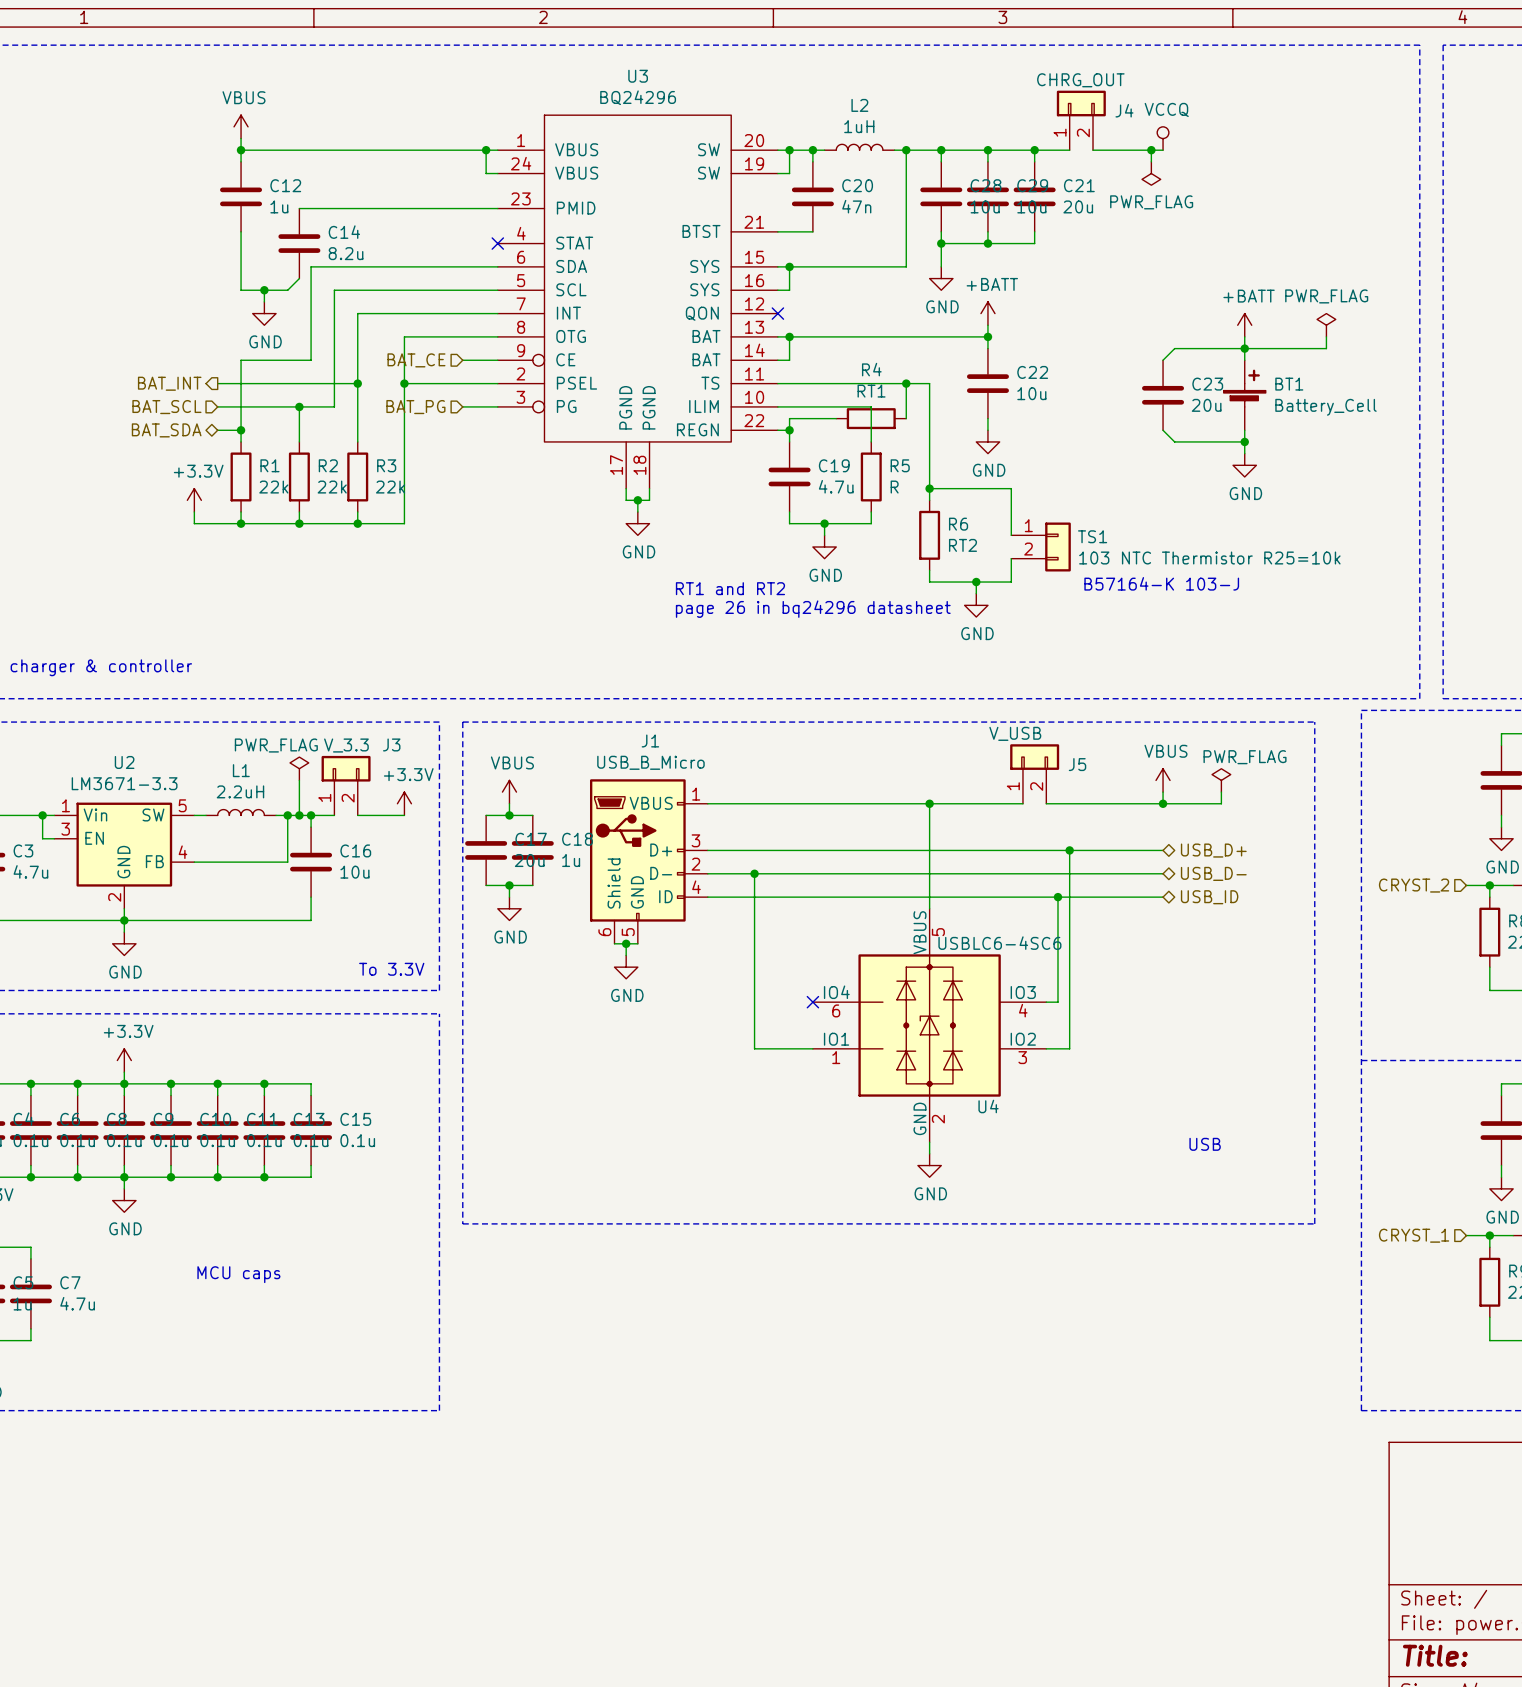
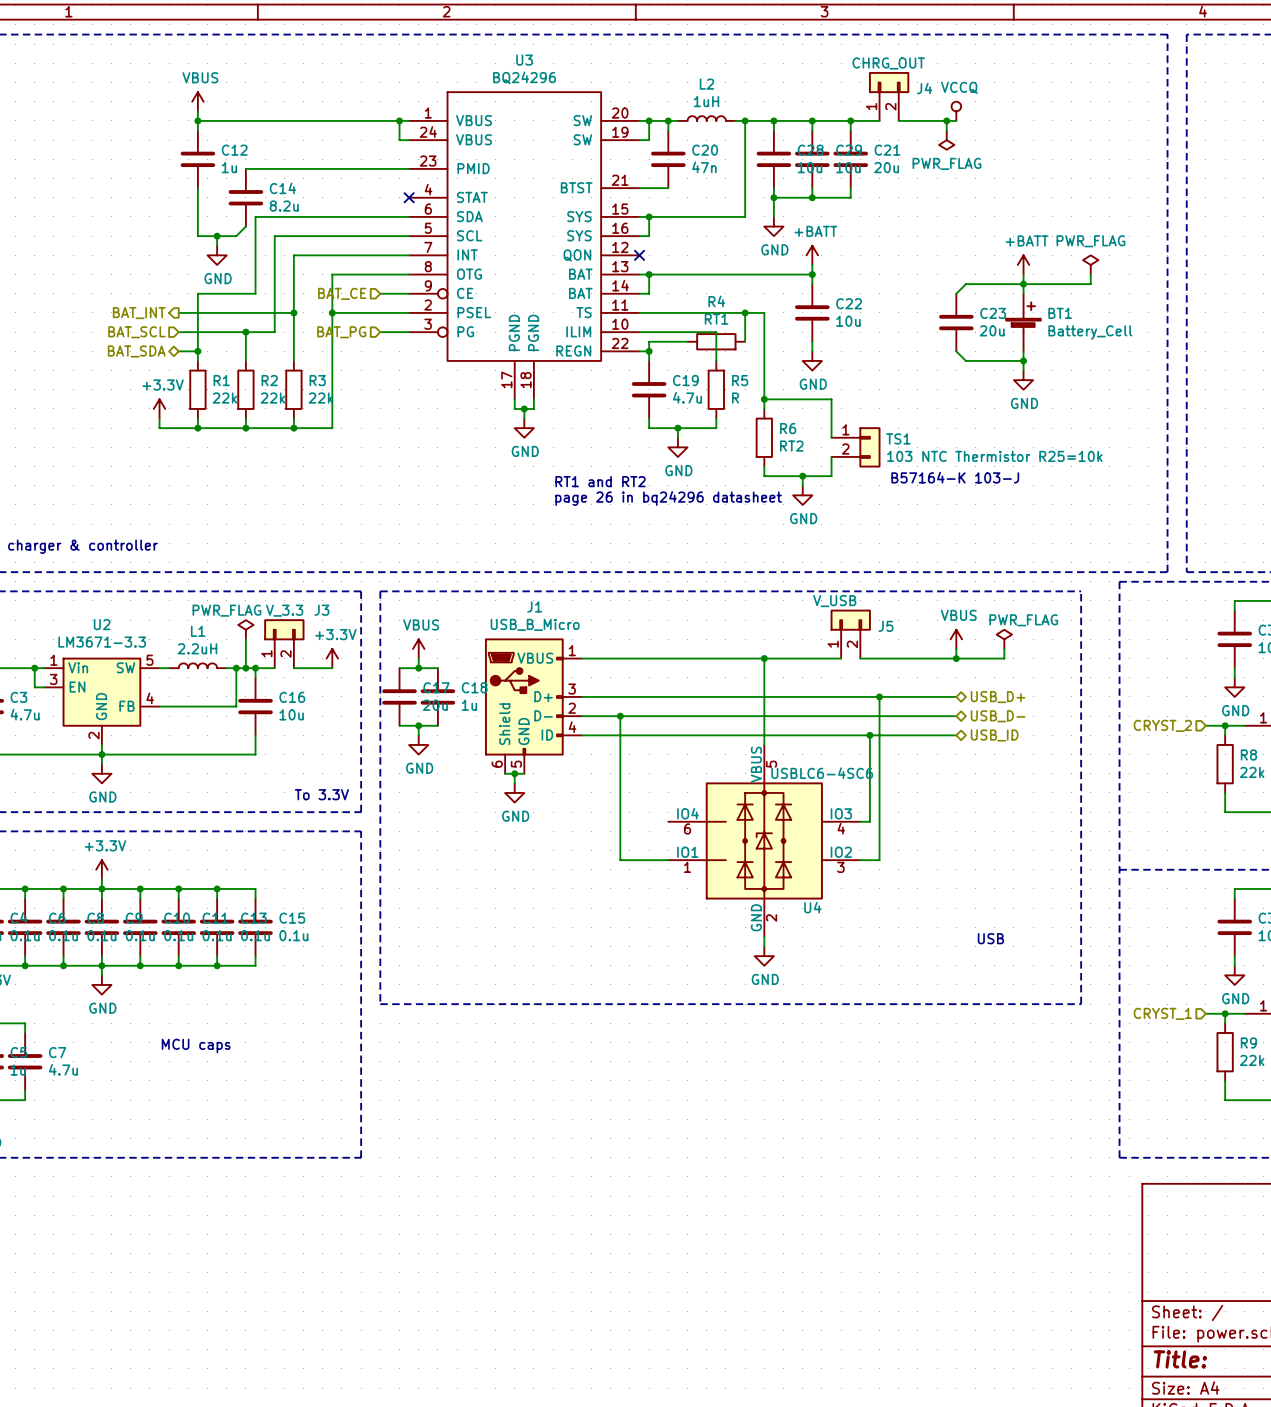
no-connect mark: (812, 1002) -> none

